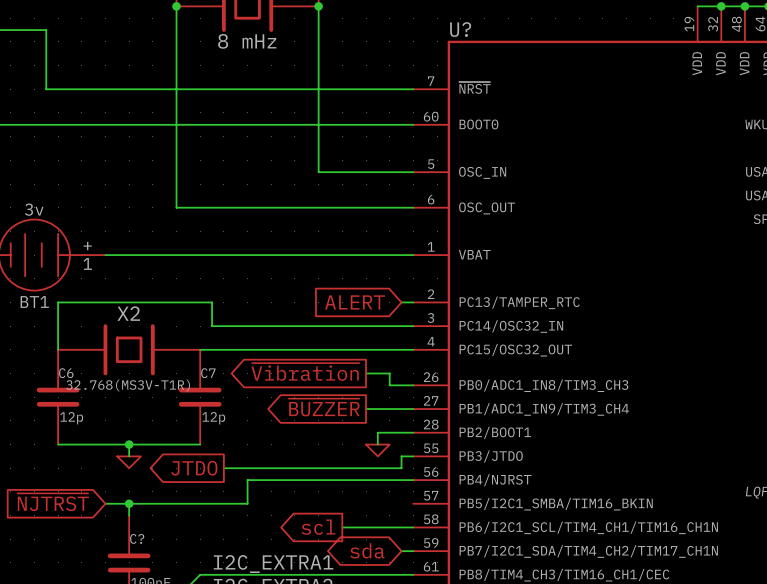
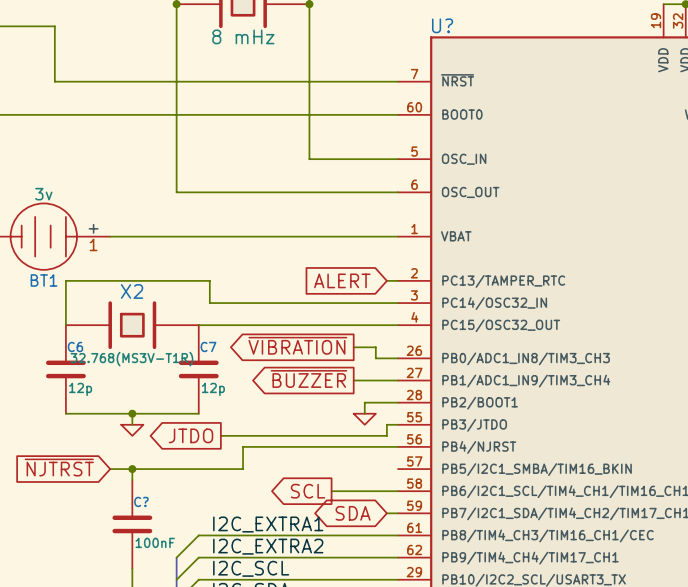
global label: ~{Vibration} (305, 371) -> ~{VIBRATION} (297, 345)
global label: scl (318, 527) -> SCL (308, 491)
global label: sda (367, 550) -> SDA (353, 513)

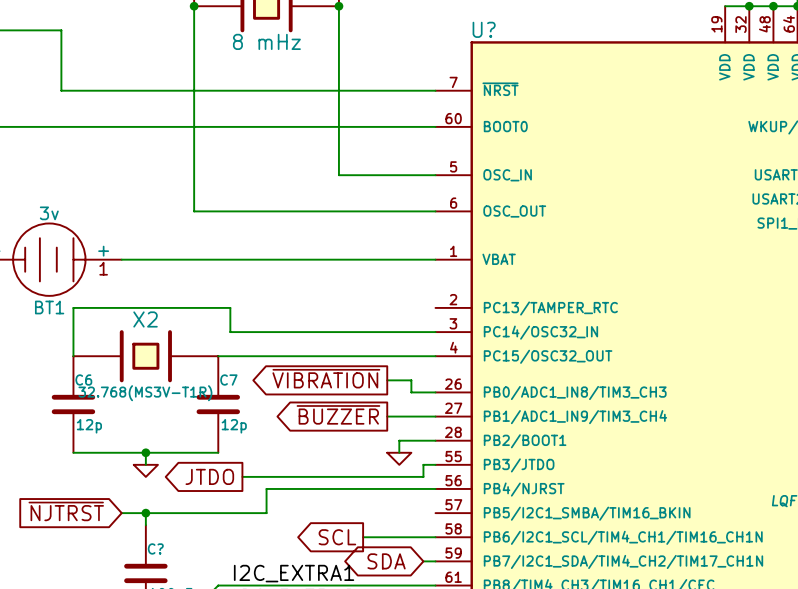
global label: ALERT (342, 280) -> none
wire: (386, 280) (397, 280) -> none

